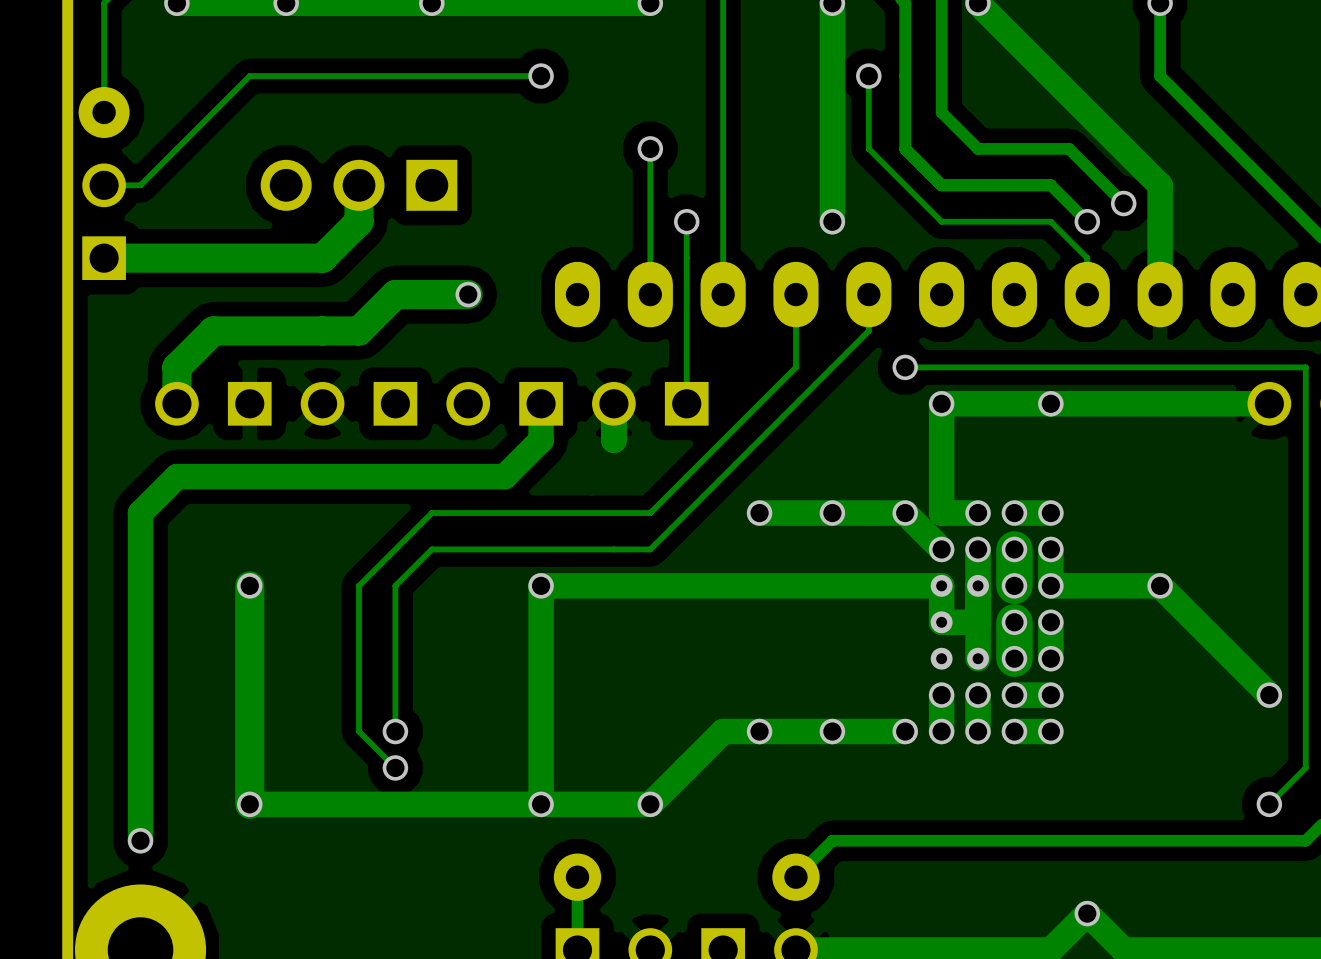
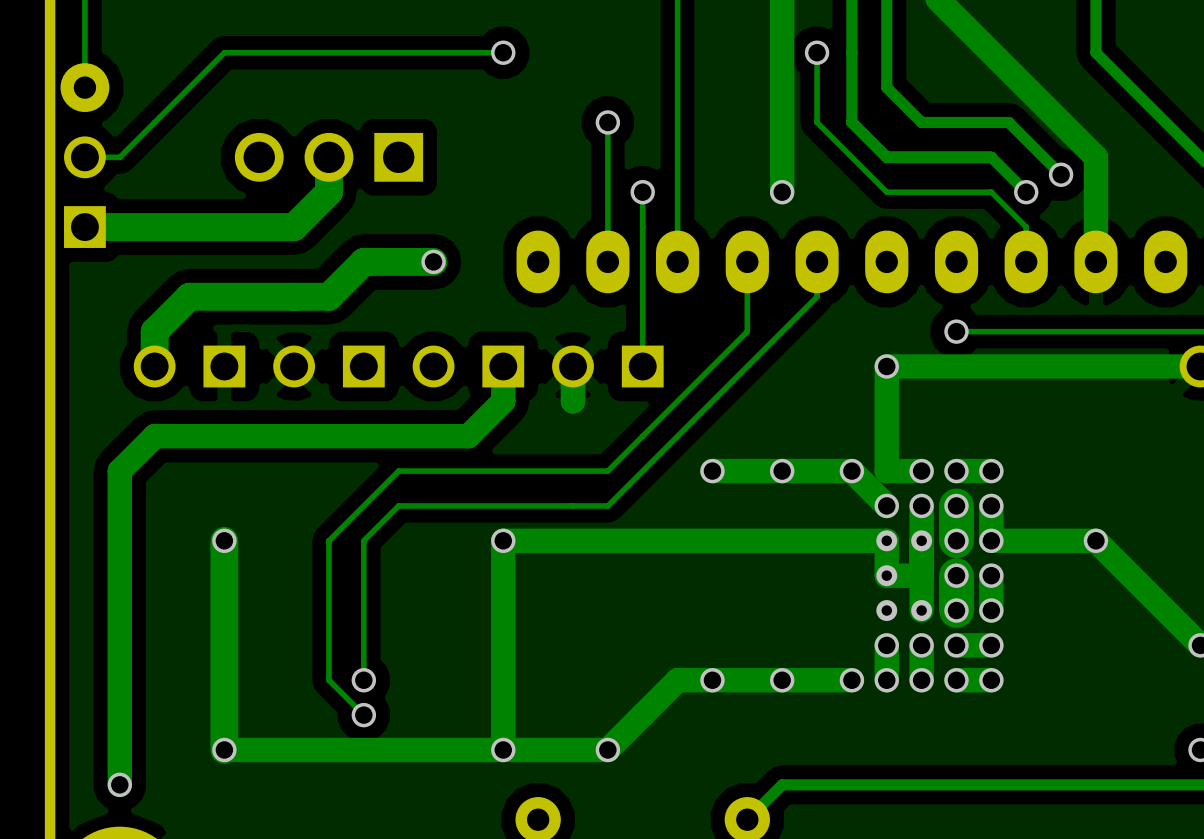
via: (905, 367) -> none
track: (1014, 367) (905, 367) -> none
via position: (1050, 403) -> (956, 331)

